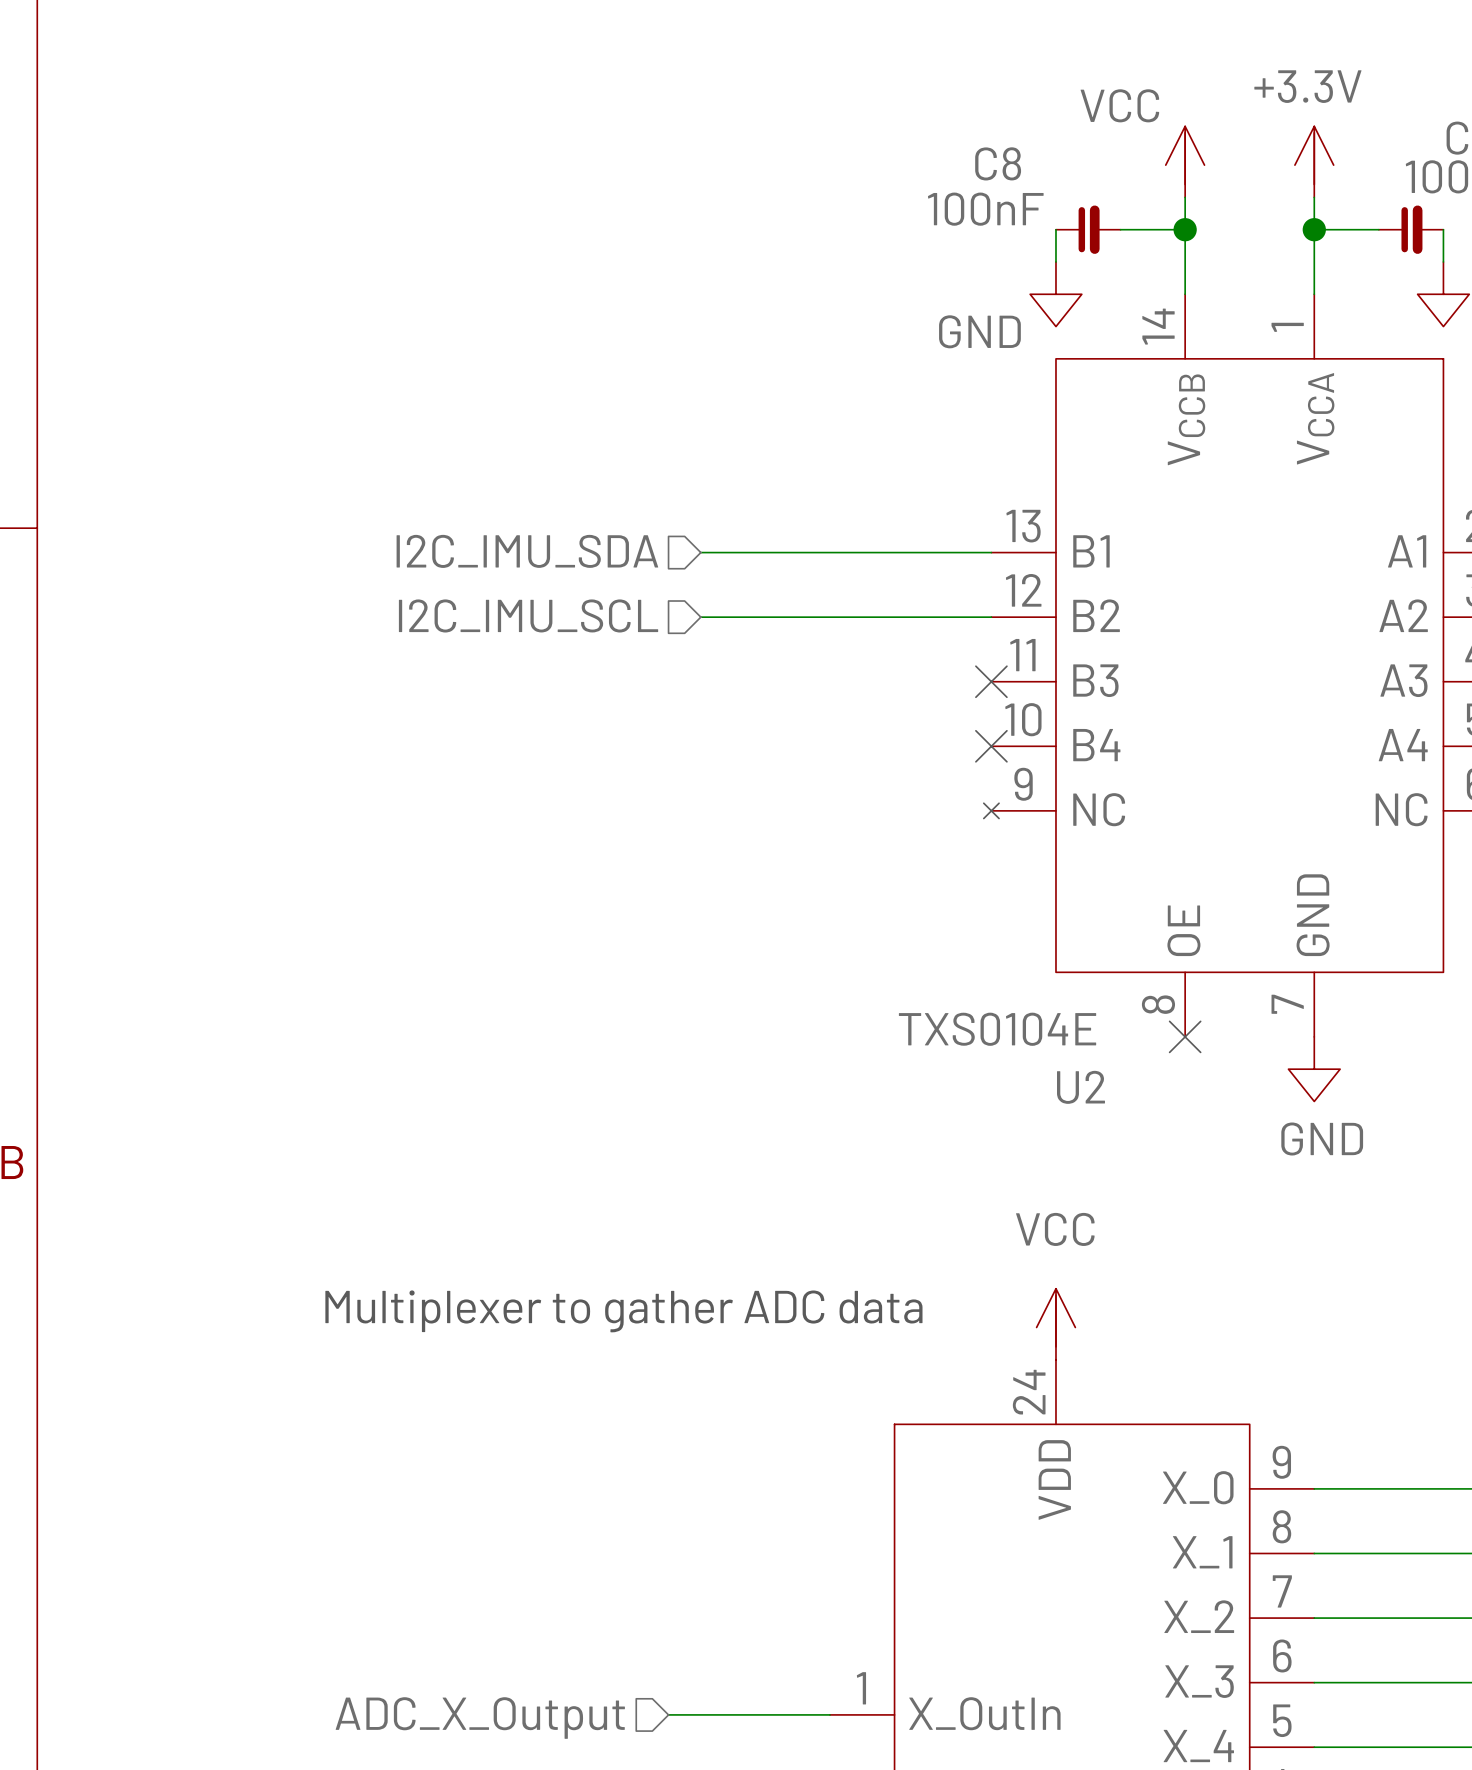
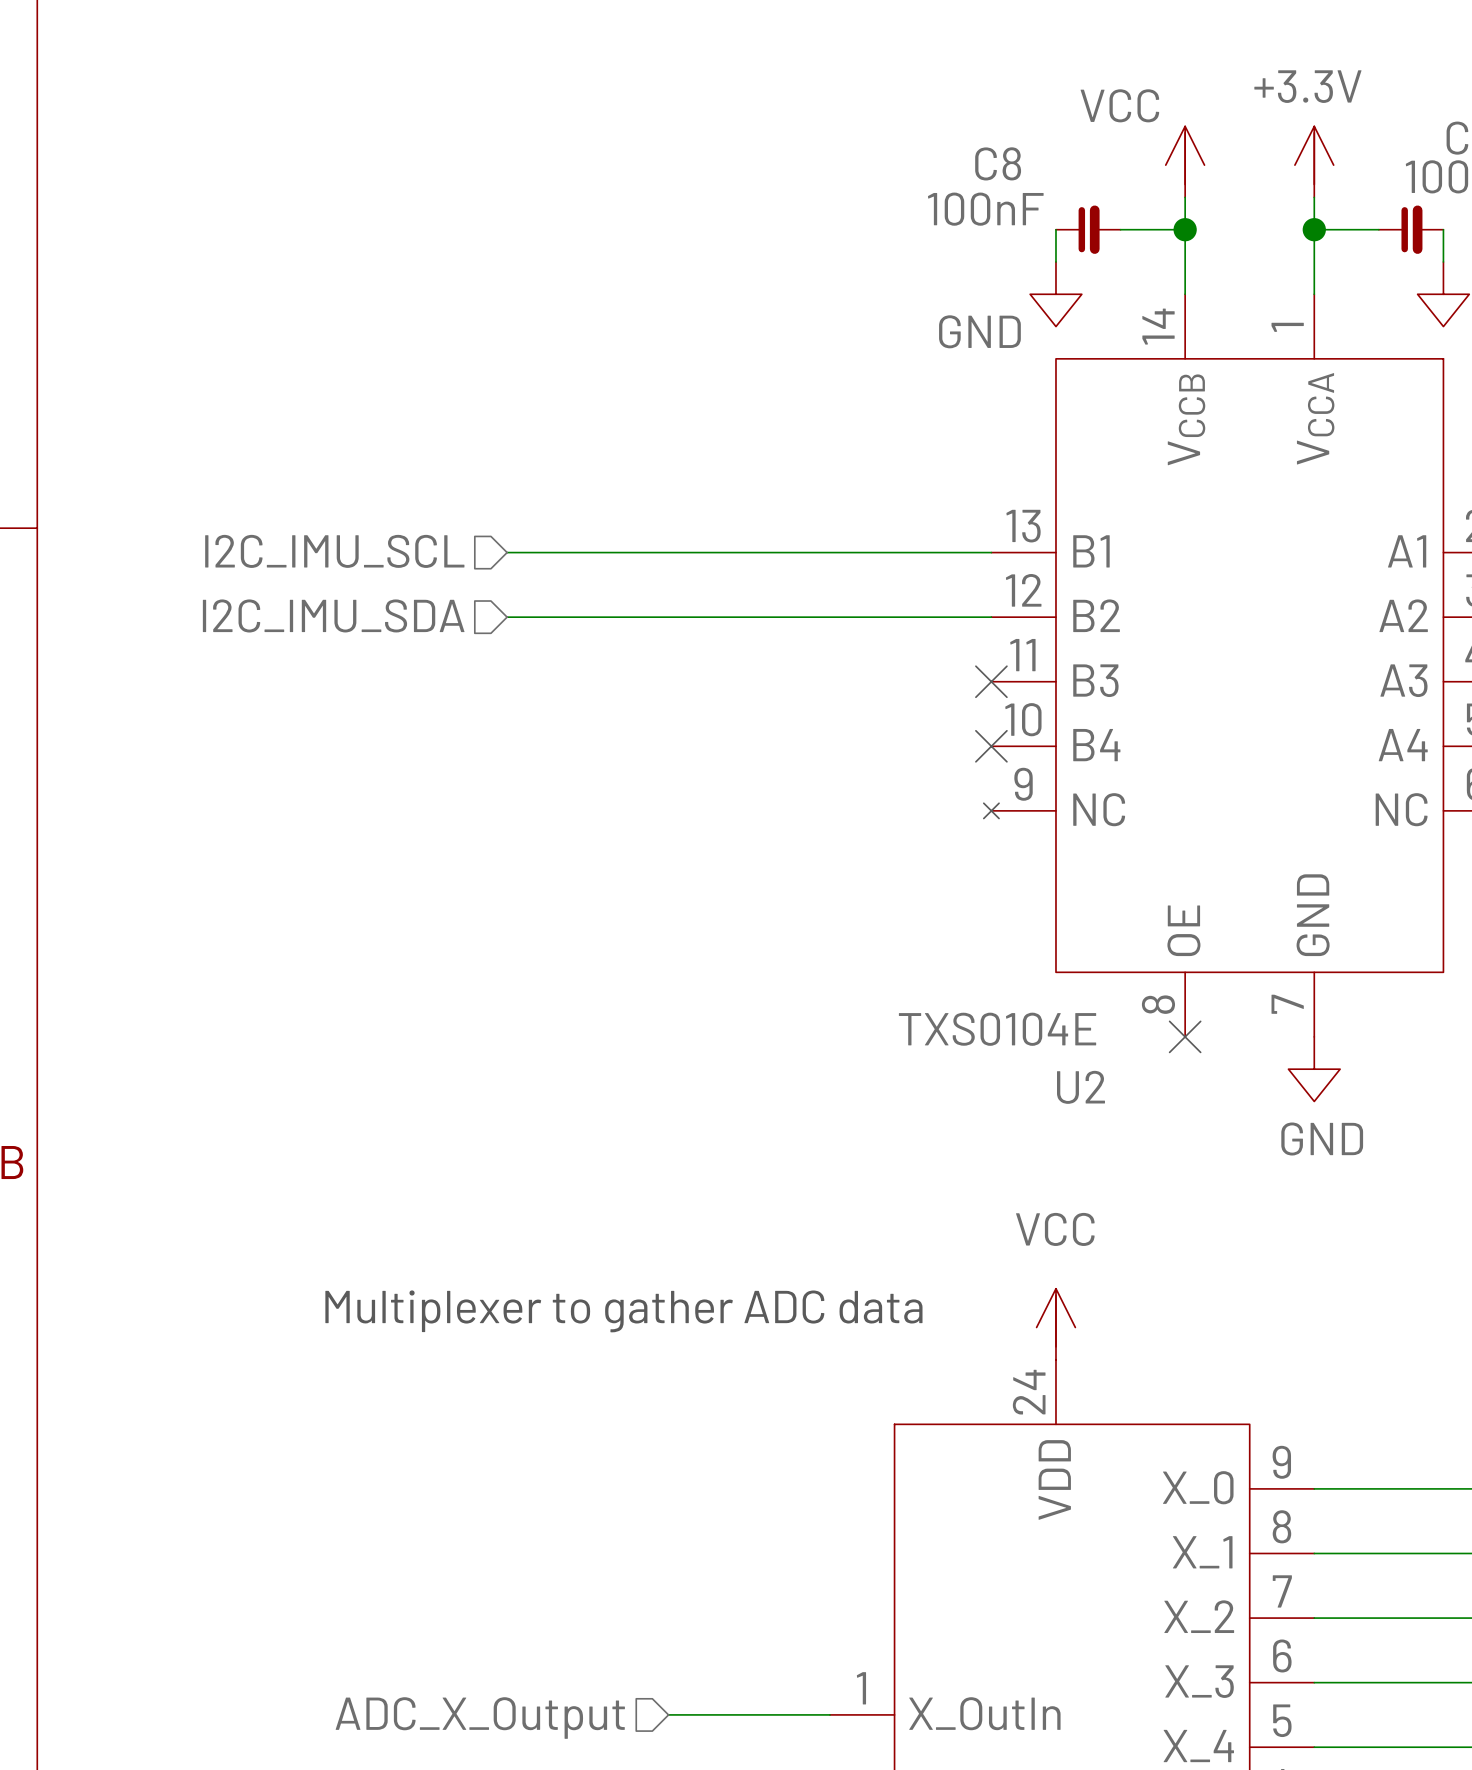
hierarchical label position: I2C_IMU_SDA (527, 551) -> I2C_IMU_SDA (333, 615)
wire: none -> (507, 552) (700, 552)
hierarchical label position: I2C_IMU_SCL (528, 615) -> I2C_IMU_SCL (334, 551)
wire: none -> (507, 617) (700, 617)

